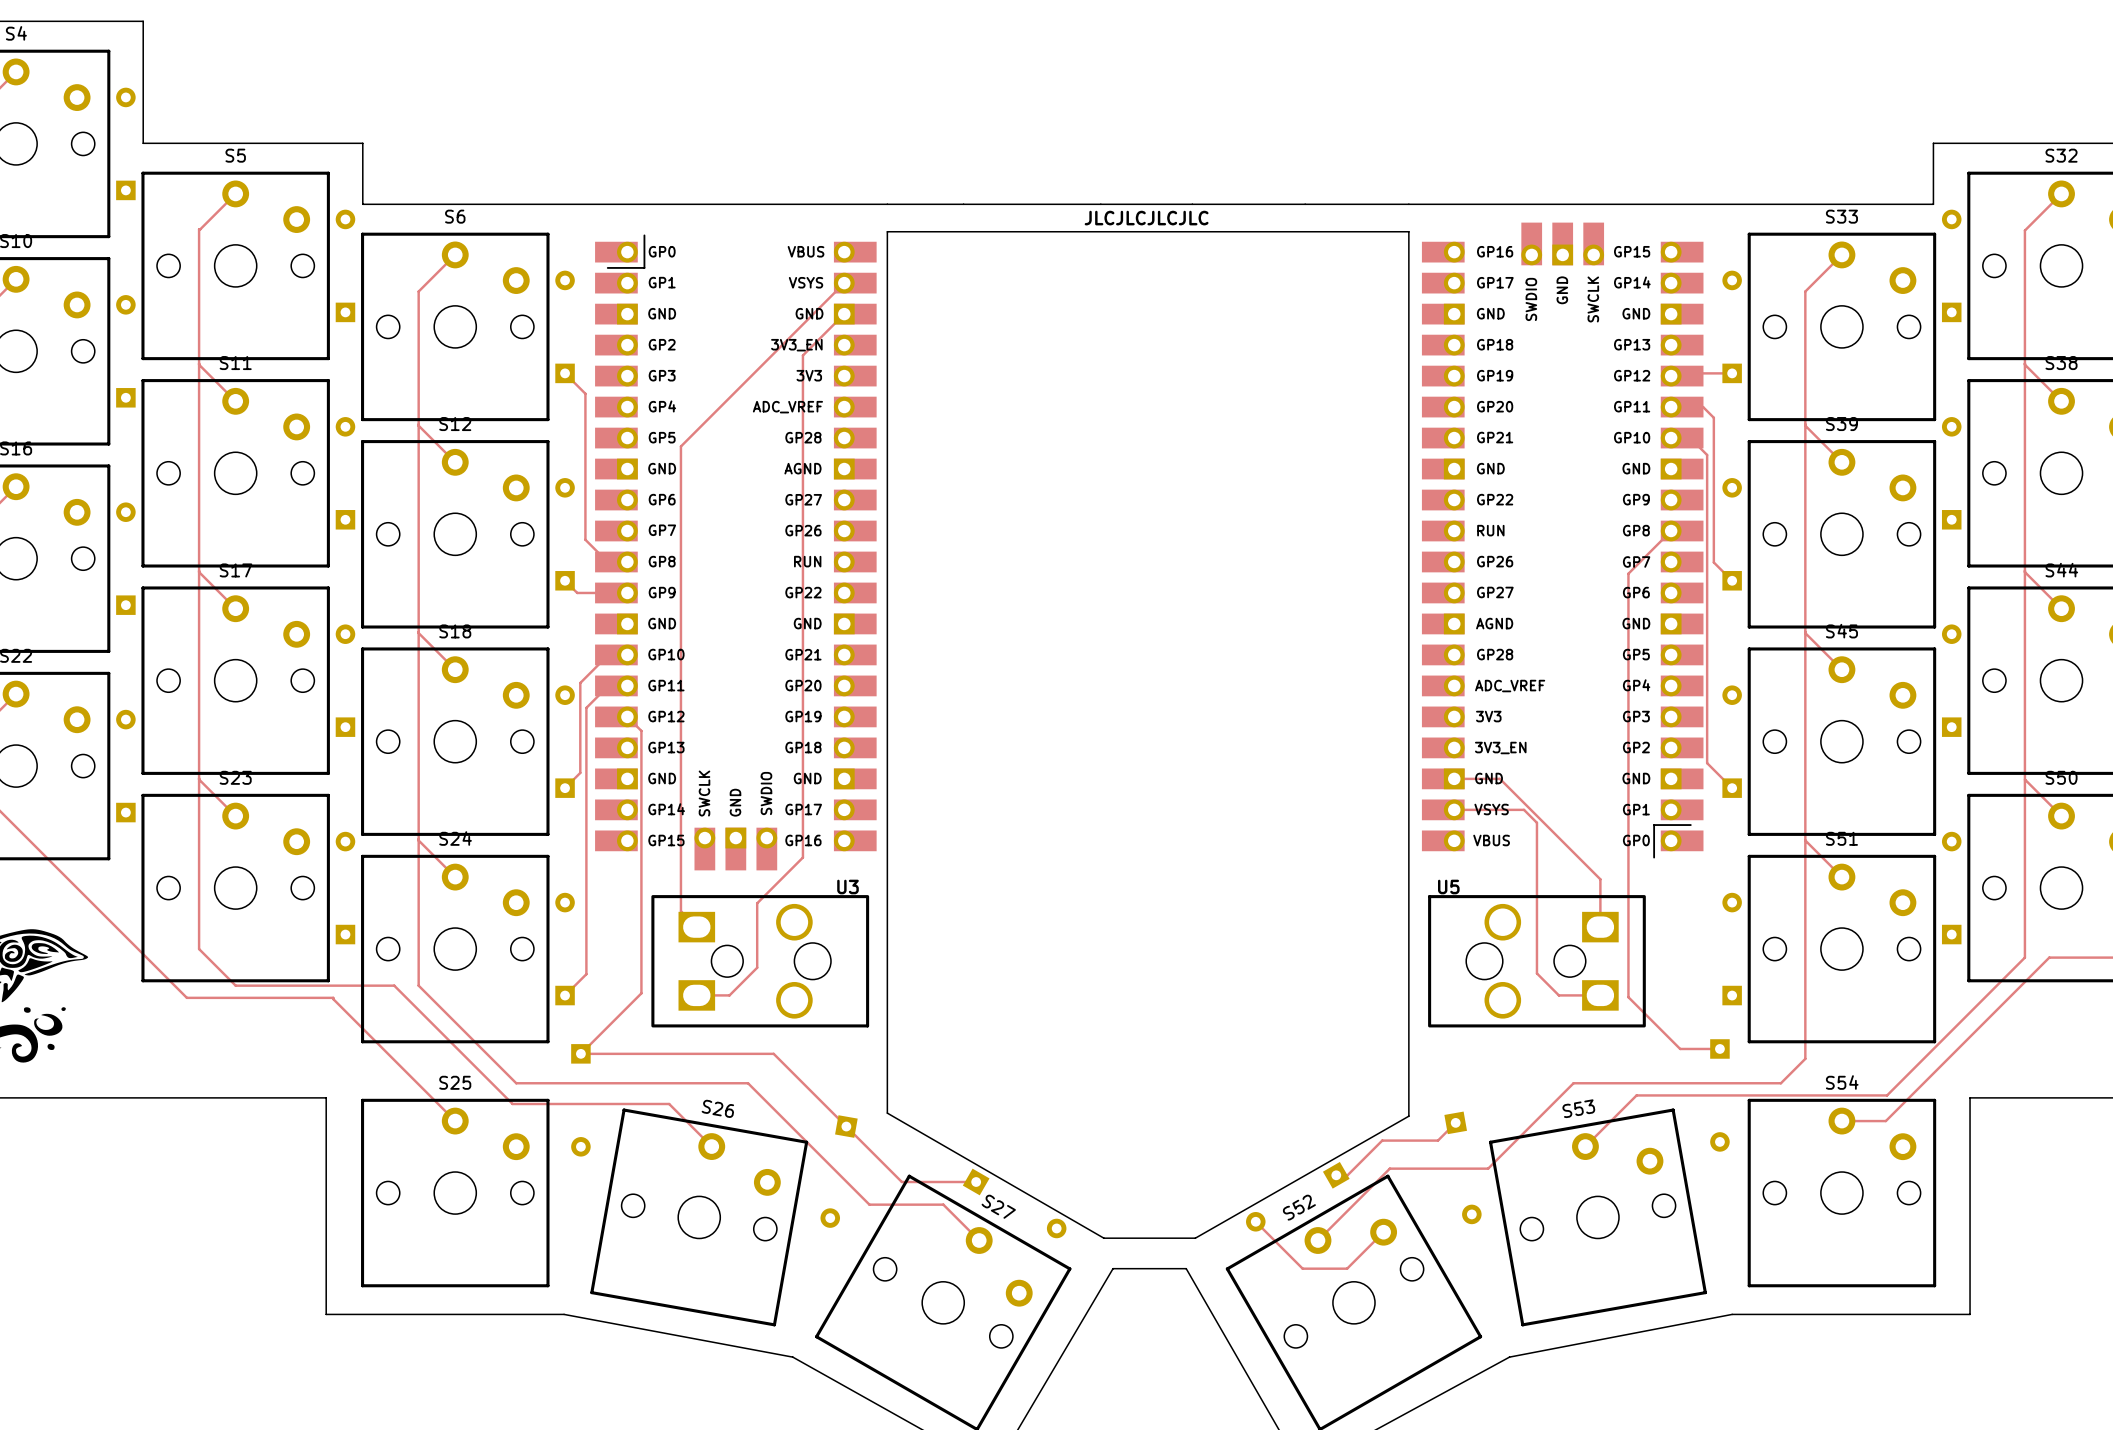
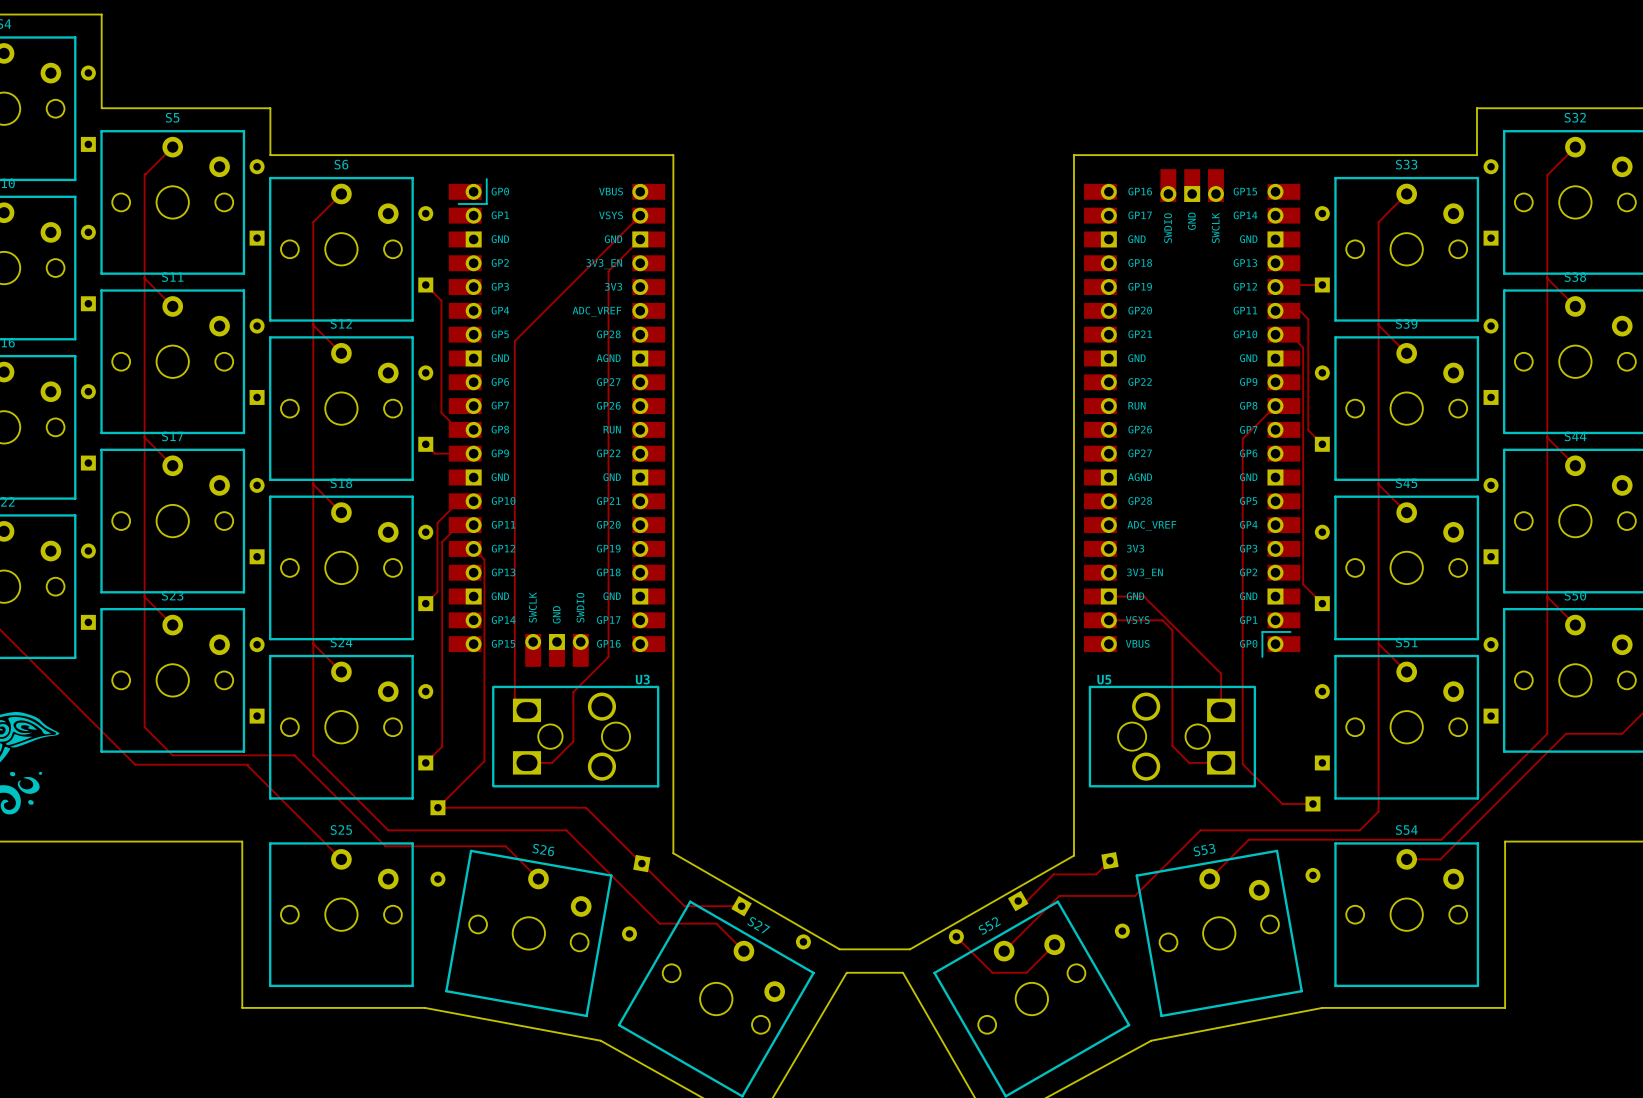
board edge: (887, 204) (1408, 204) -> (673, 155) (673, 176)
text: JLCJLCJLCJLC (1146, 218) -> none
board edge: (887, 231) (1408, 231) -> (1074, 155) (1074, 176)

